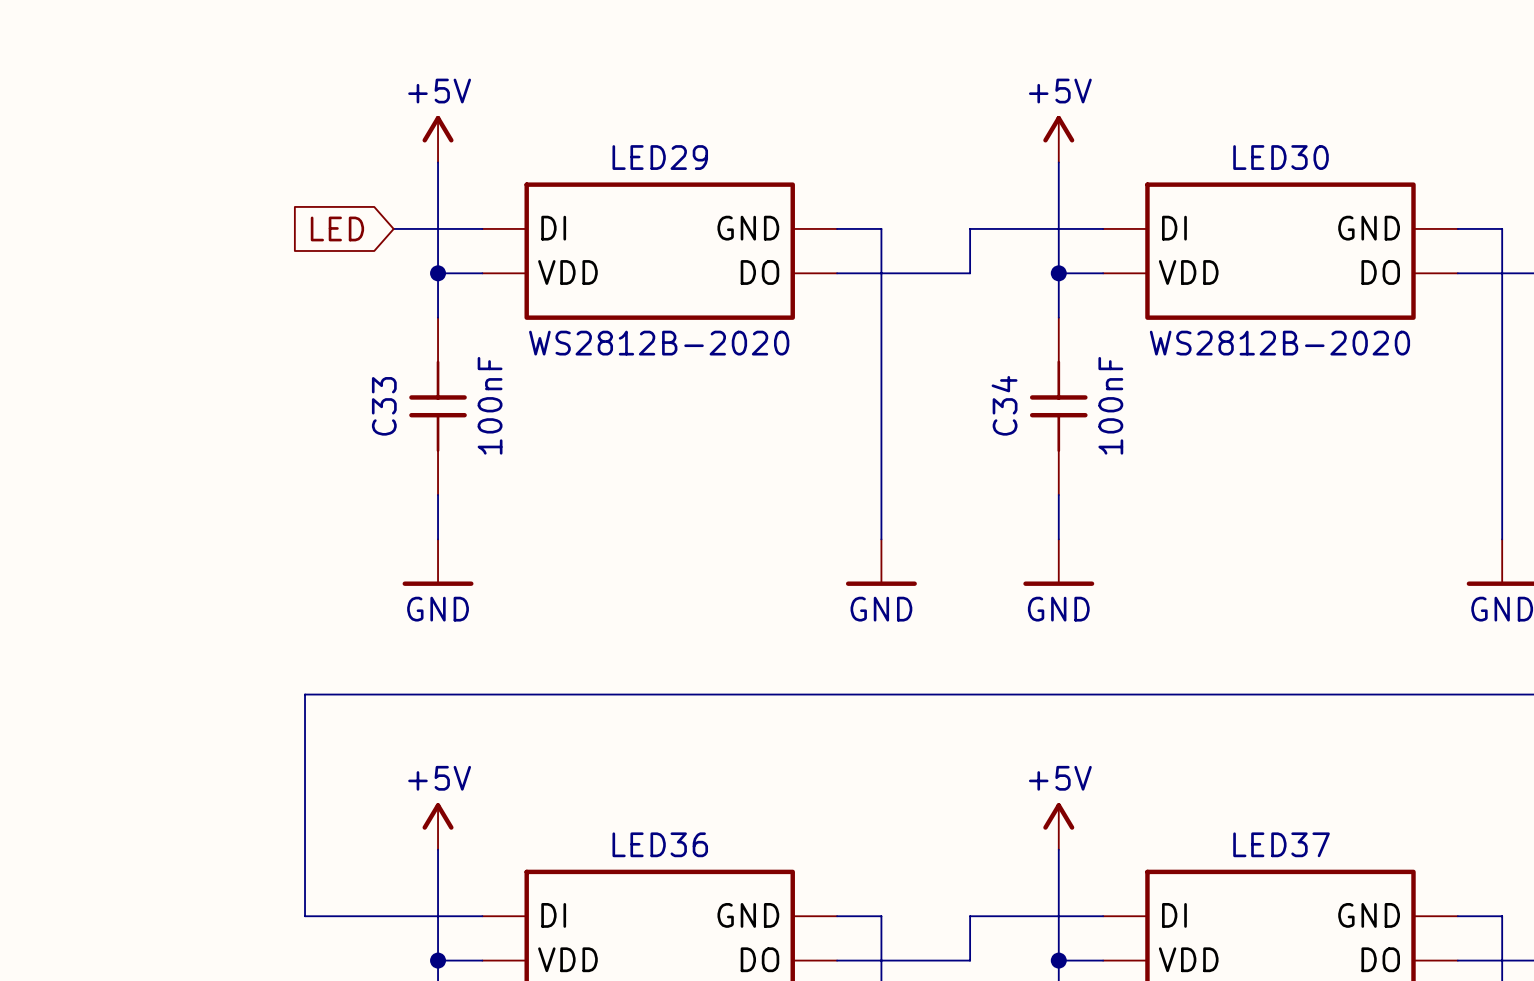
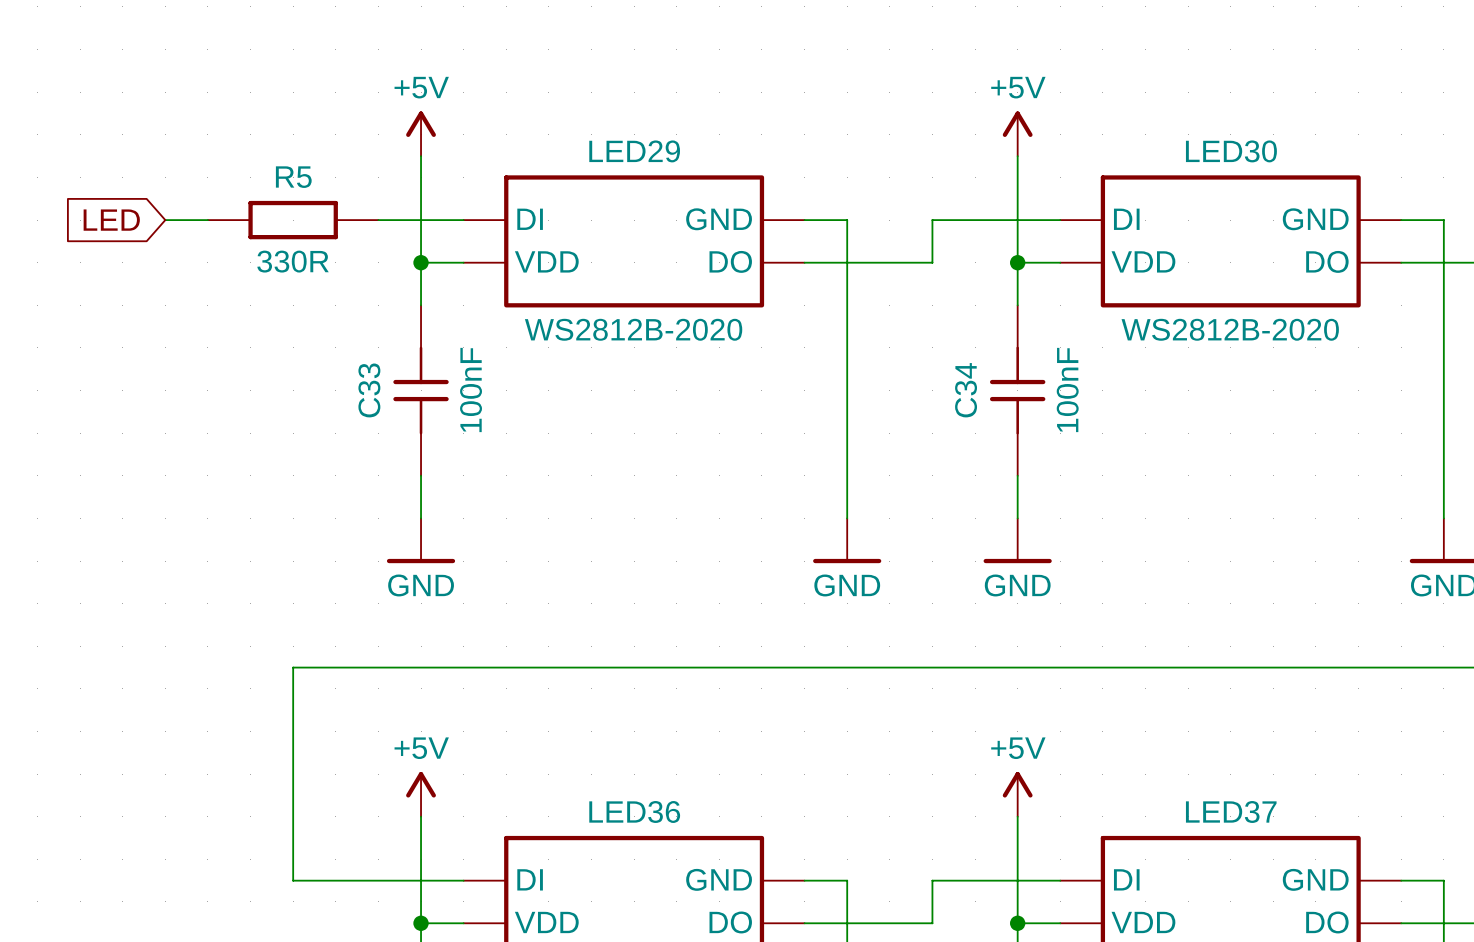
wire: none -> (165, 220) (207, 220)
R5: none -> 330R (293, 220)
global label position: LED (337, 228) -> LED (111, 220)

